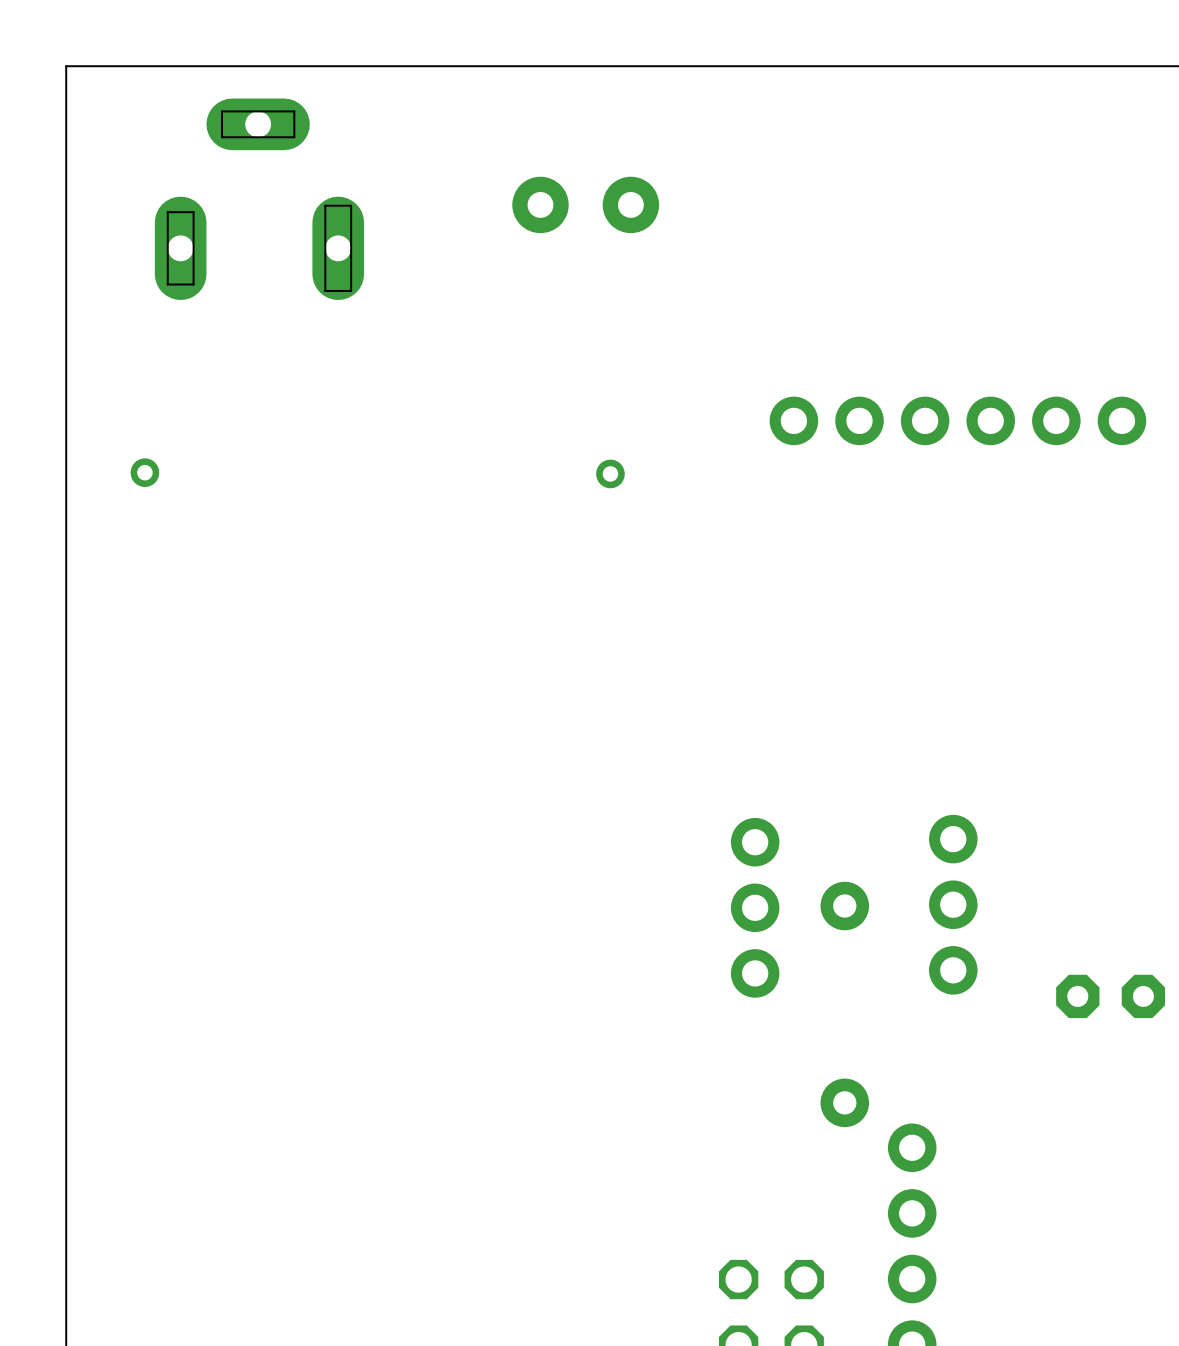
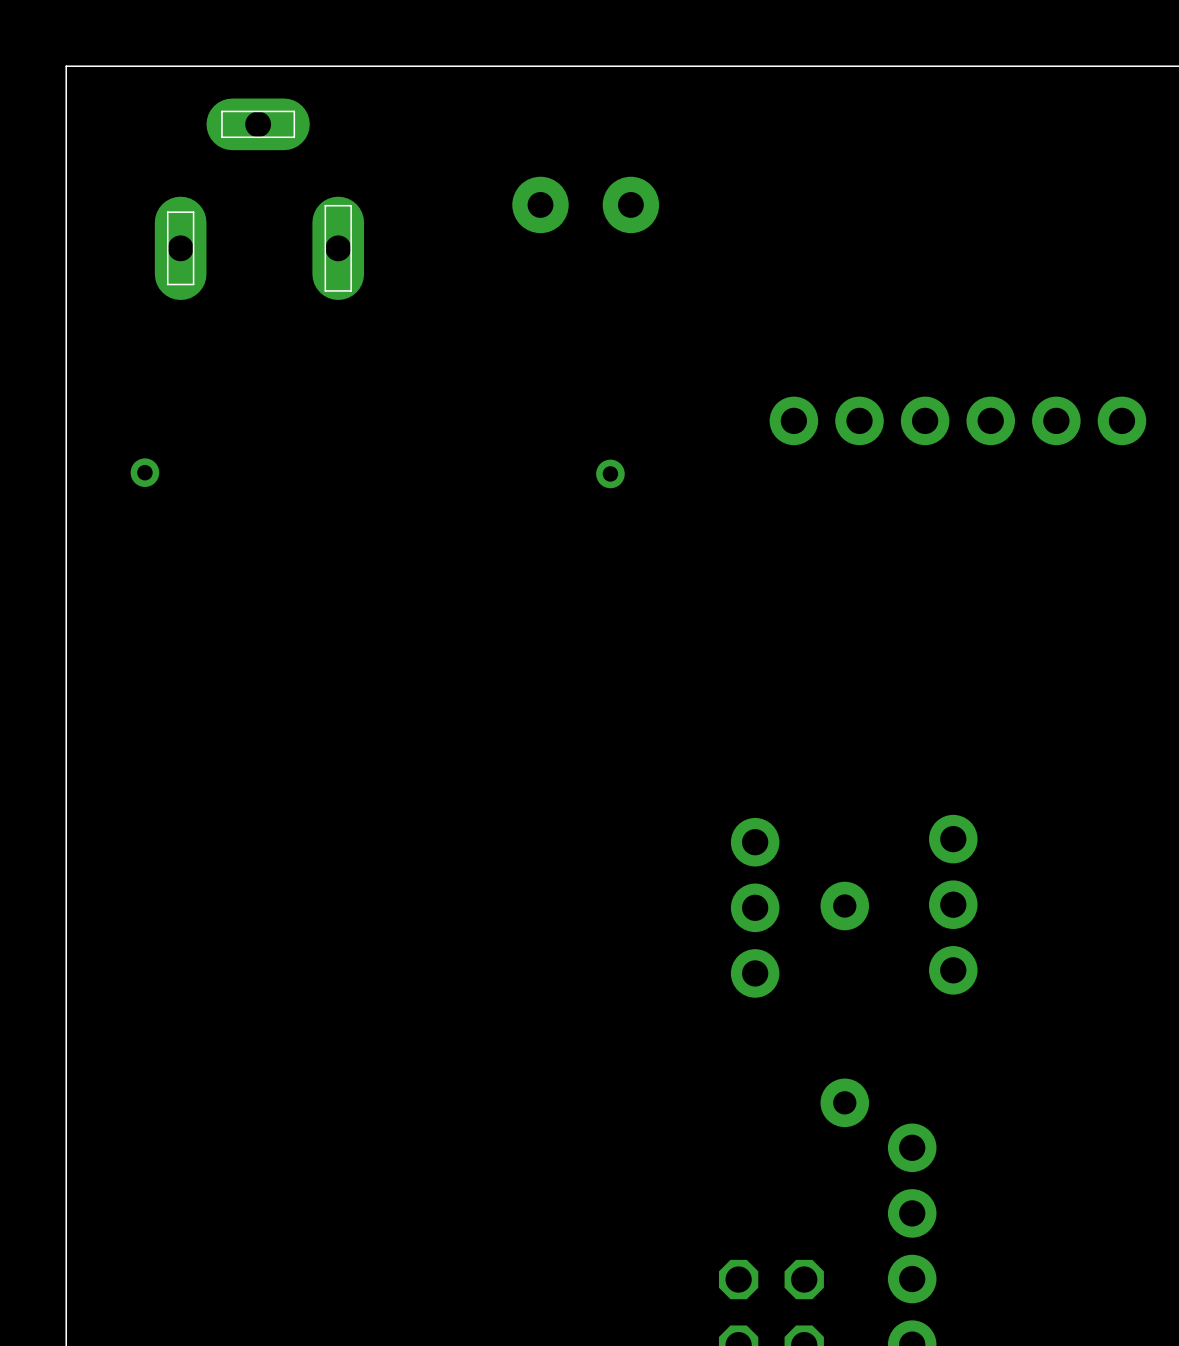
part: (1110, 996) -> none

